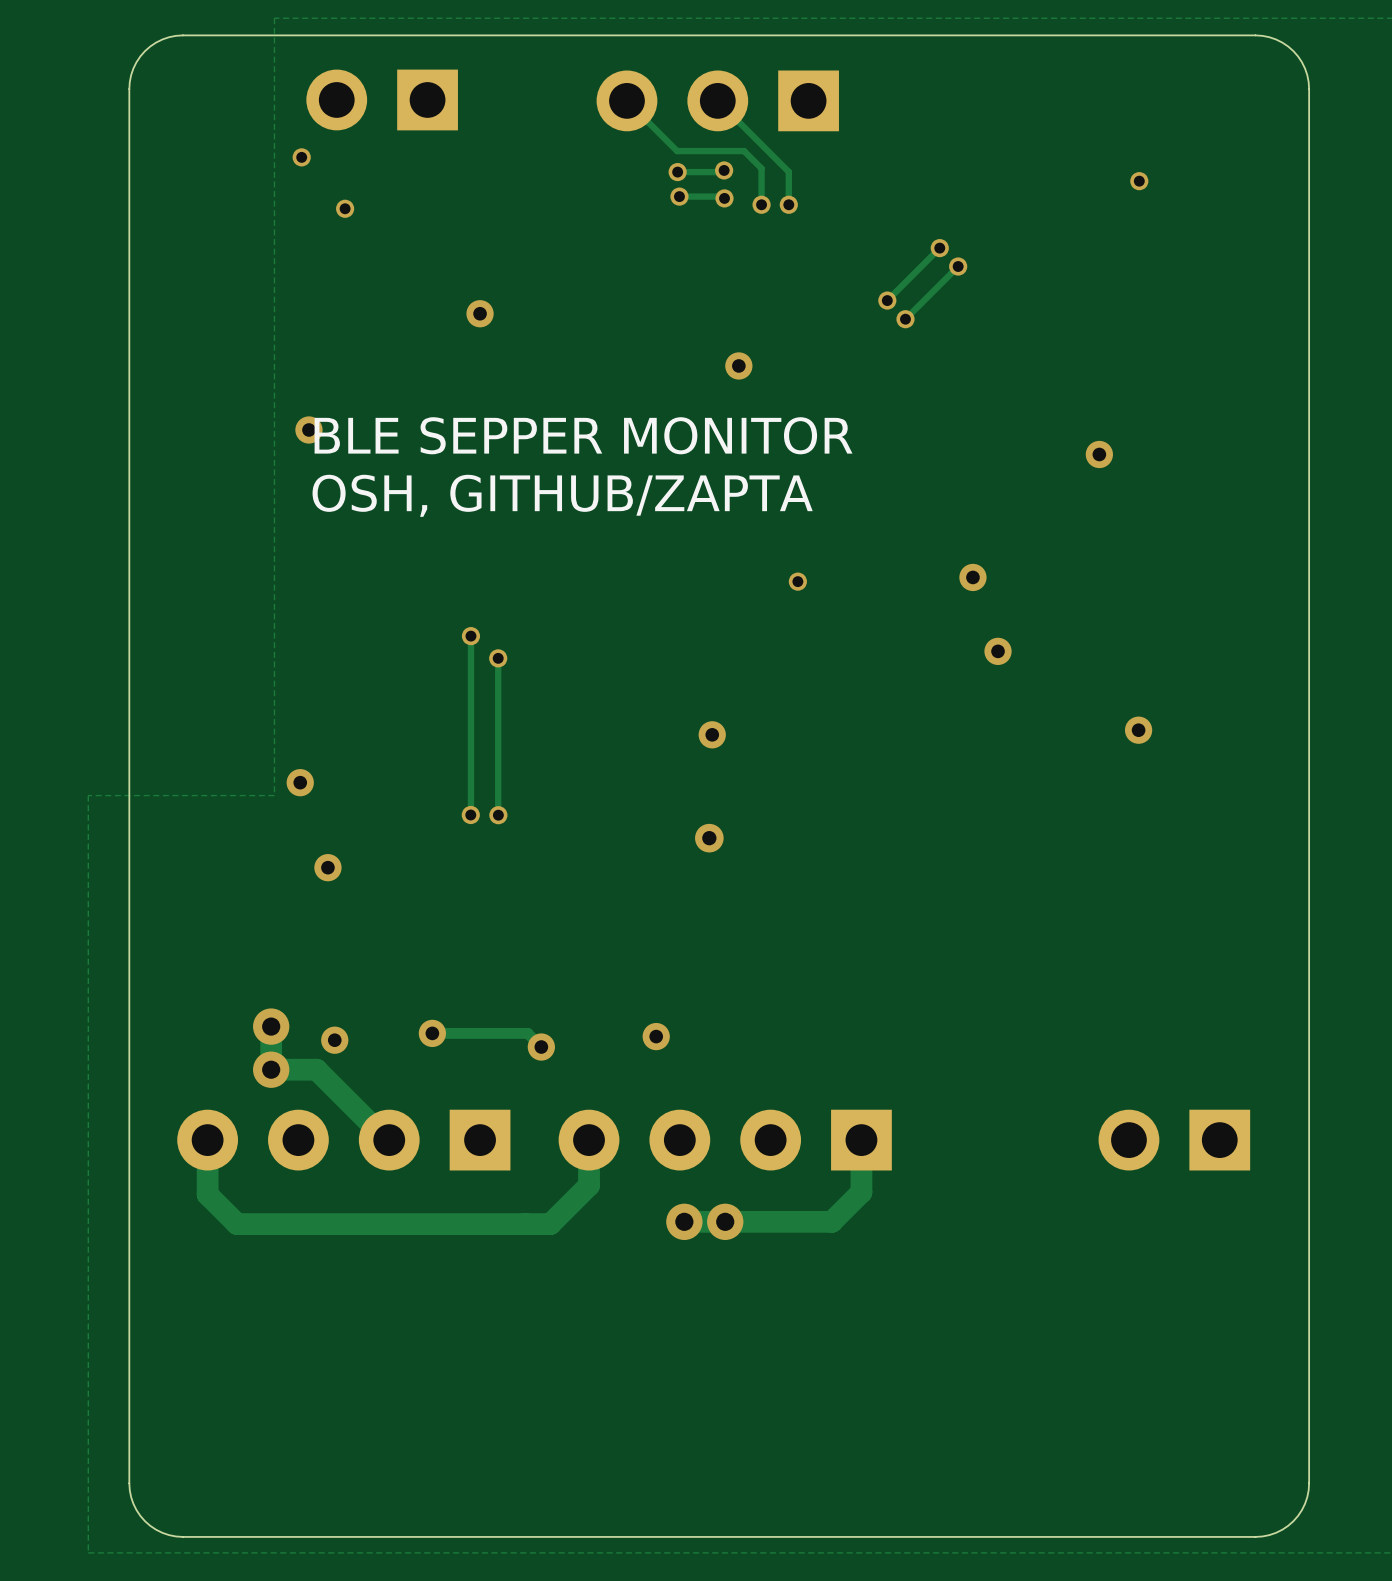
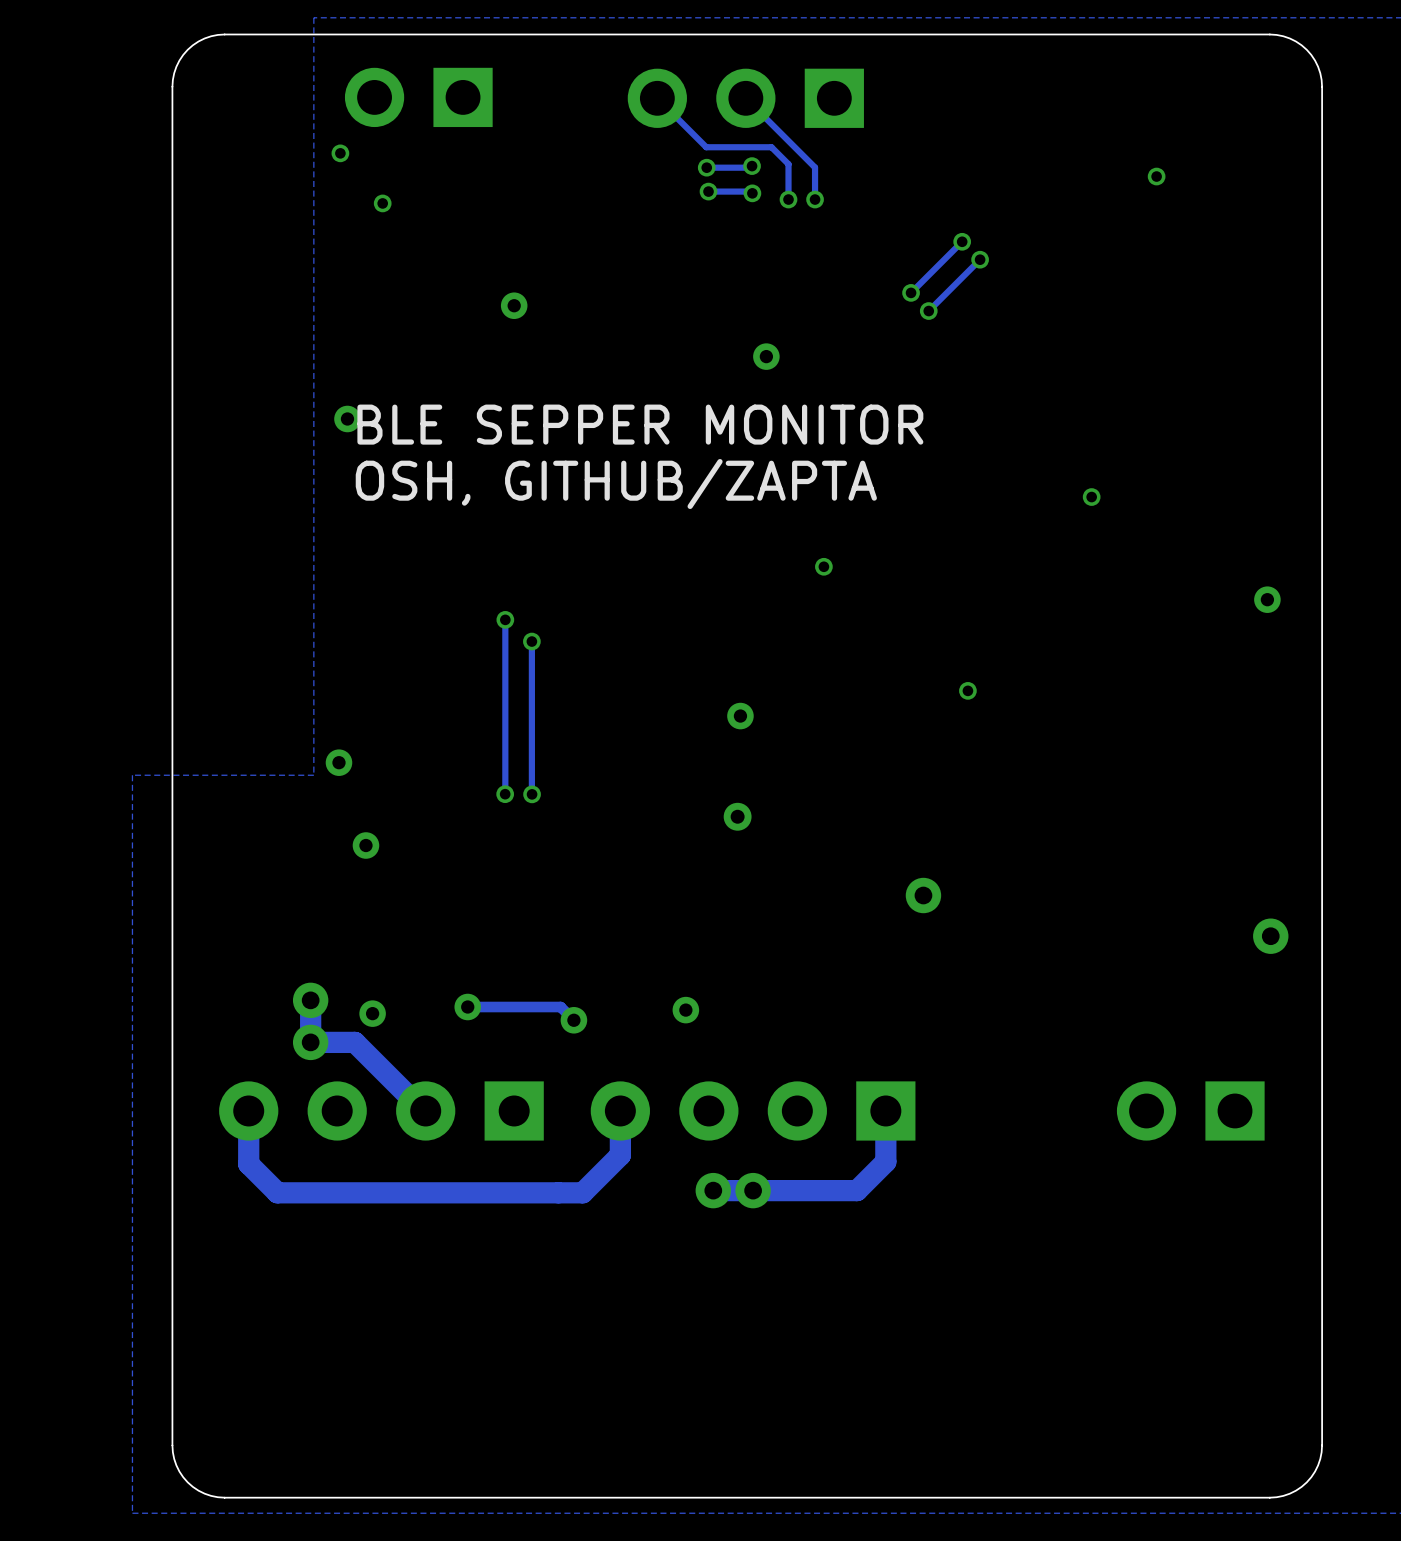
via: (1099, 454) -> none
via: none -> (1091, 497)
via: (972, 577) -> none
via: none -> (1267, 599)
via: (998, 651) -> none
via: none -> (967, 690)
via: (1138, 730) -> none
via: none -> (923, 895)
via: none -> (1270, 936)

